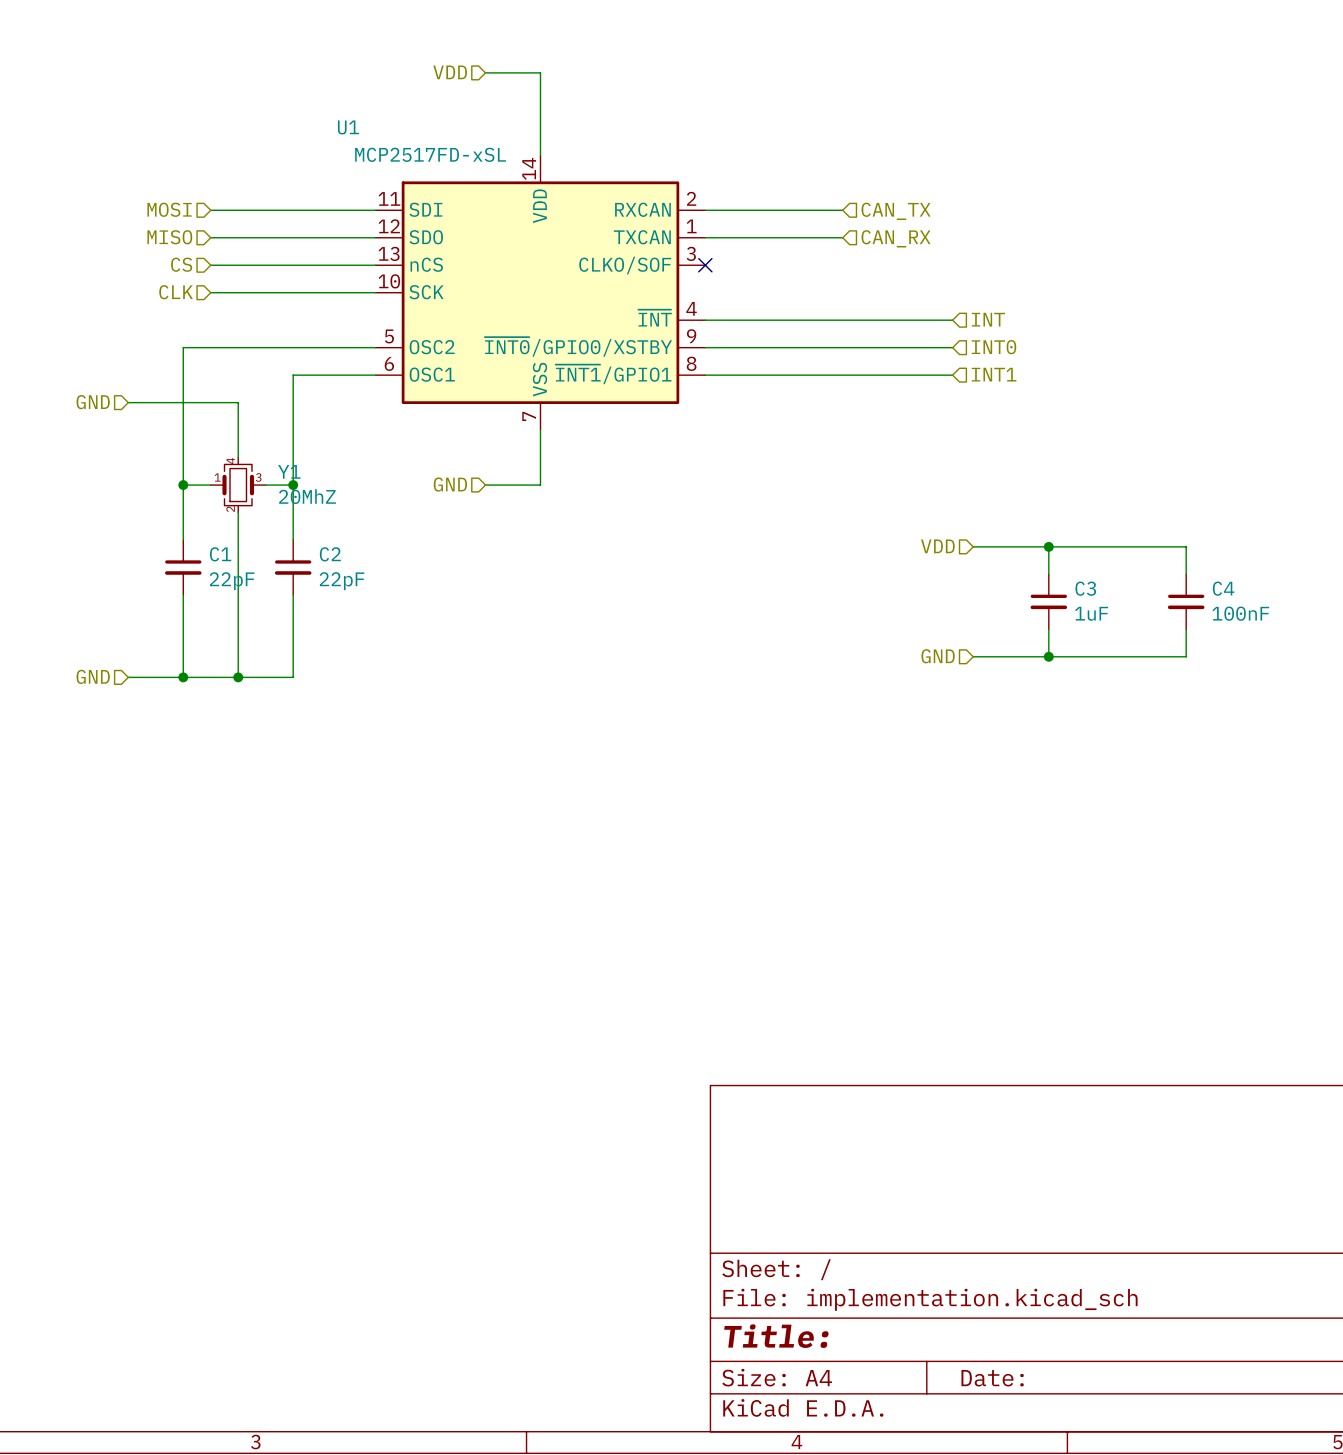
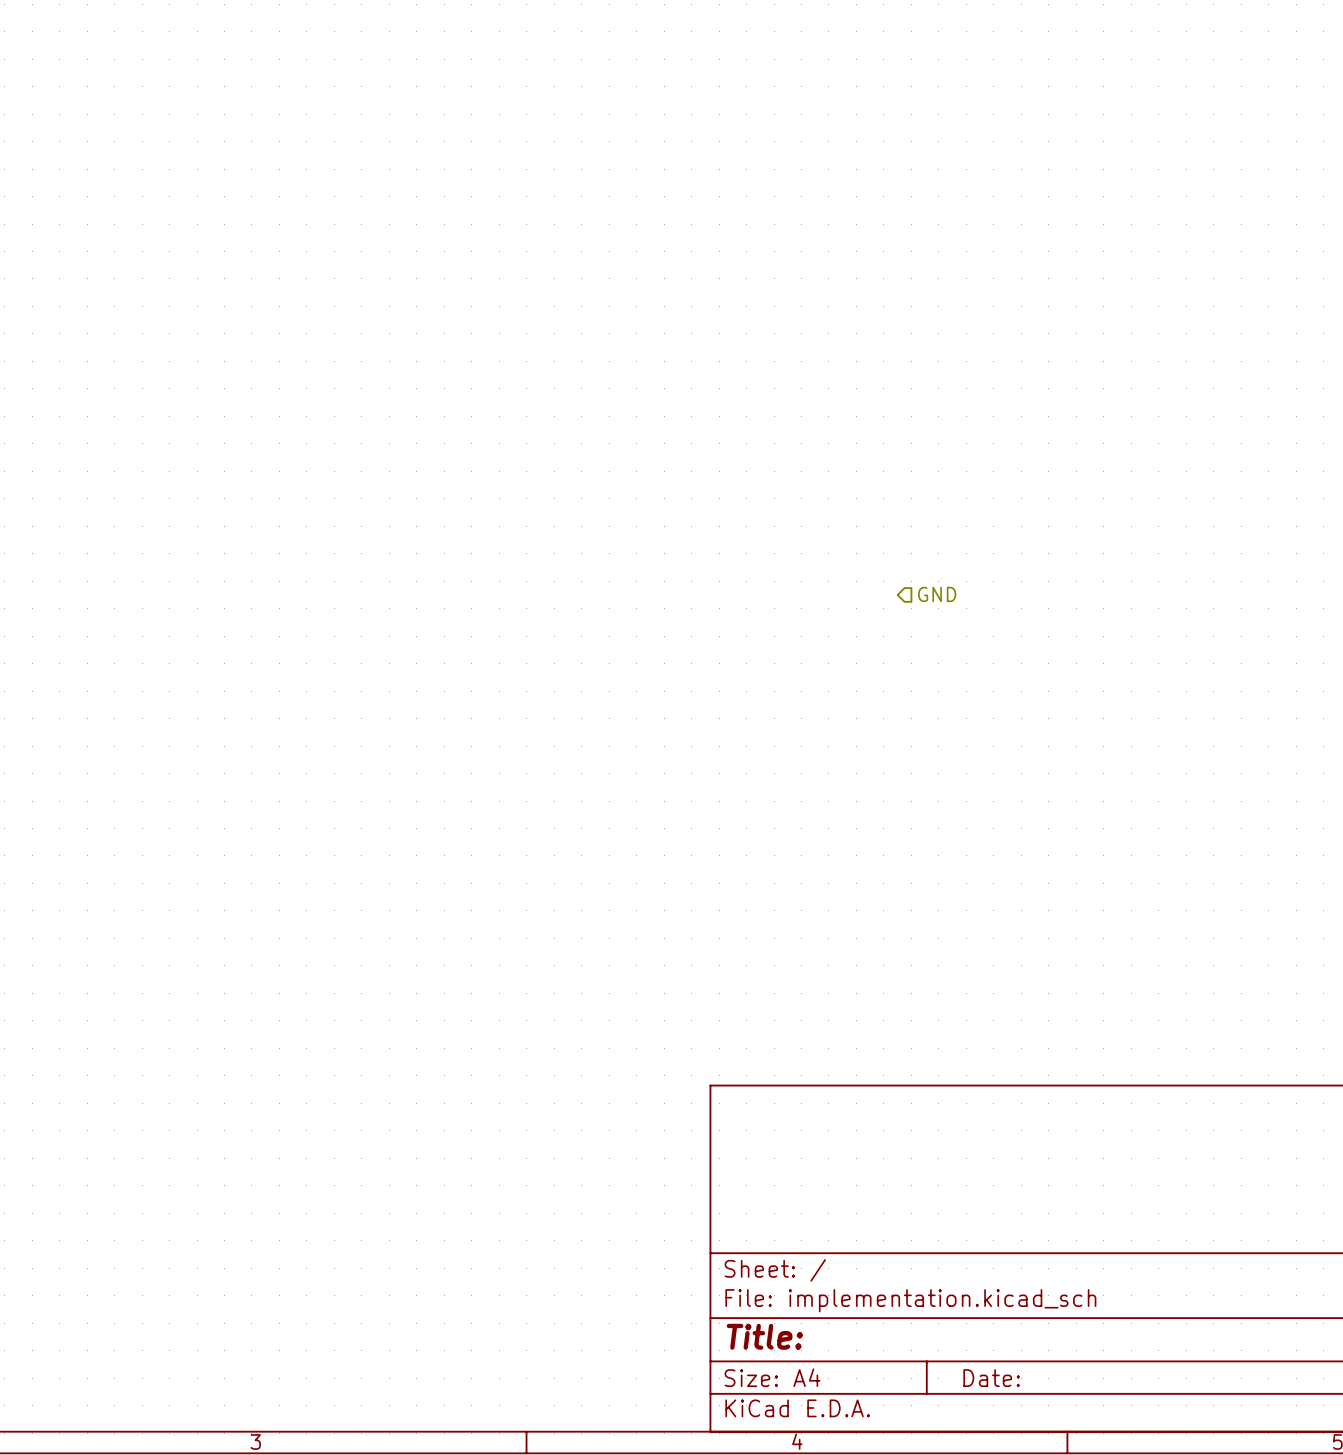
hierarchical label: VDD (450, 72) -> none
wire: (485, 72) (540, 72) (540, 155) -> none
hierarchical label: MOSI (169, 209) -> none
wire: (210, 210) (375, 210) -> none
wire: (705, 210) (842, 210) -> none
hierarchical label: CAN_TX (896, 211) -> none
hierarchical label: MISO (169, 237) -> none
wire: (210, 237) (375, 237) -> none
wire: (705, 237) (842, 237) -> none
hierarchical label: CAN_RX (896, 238) -> none
hierarchical label: CS (181, 264) -> none
wire: (210, 265) (375, 265) -> none
no-connect mark: (705, 265) -> none
hierarchical label: CLK (176, 292) -> none
wire: (210, 292) (375, 292) -> none
U1: MCP2517FD-xSL (540, 292) -> none
hierarchical label: INT (988, 319) -> none
wire: (705, 320) (952, 320) -> none
wire: (375, 347) (183, 347) (183, 540) -> none
wire: (705, 347) (952, 347) -> none
hierarchical label: INT0 (993, 347) -> none
hierarchical label: INT1 (994, 374) -> none
wire: (375, 375) (293, 375) (293, 540) -> none
wire: (705, 375) (952, 375) -> none
hierarchical label: GND (93, 402) -> none
wire: (128, 402) (238, 402) (238, 457) -> none
wire: (540, 430) (540, 485) (485, 485) -> none
hierarchical label: GND (450, 484) -> none
wire: (183, 485) (210, 485) -> none
junction: (183, 485) -> none
Y1: 20MhZ (238, 485) -> none
wire: (265, 485) (293, 485) -> none
junction: (293, 485) -> none
wire: (238, 512) (238, 677) -> none
hierarchical label: VDD (937, 546) -> none
wire: (973, 546) (1186, 546) (1186, 574) -> none
wire: (1048, 546) (1048, 574) -> none
junction: (1048, 546) -> none
C1: 22pF (183, 567) -> none
C2: 22pF (293, 567) -> none
wire: (183, 594) (183, 677) -> none
wire: (293, 594) (293, 677) (128, 677) -> none
C3: 1uF (1048, 601) -> none
C4: 100nF (1186, 601) -> none
wire: (1048, 629) (1048, 656) -> none
wire: (1186, 629) (1186, 656) (973, 656) -> none
hierarchical label rotation: 0° (938, 656) -> 180° (937, 594)
hierarchical label position: GND (938, 656) -> GND (937, 594)
junction: (1048, 656) -> none
hierarchical label: GND (93, 676) -> none
junction: (183, 677) -> none
junction: (238, 677) -> none

